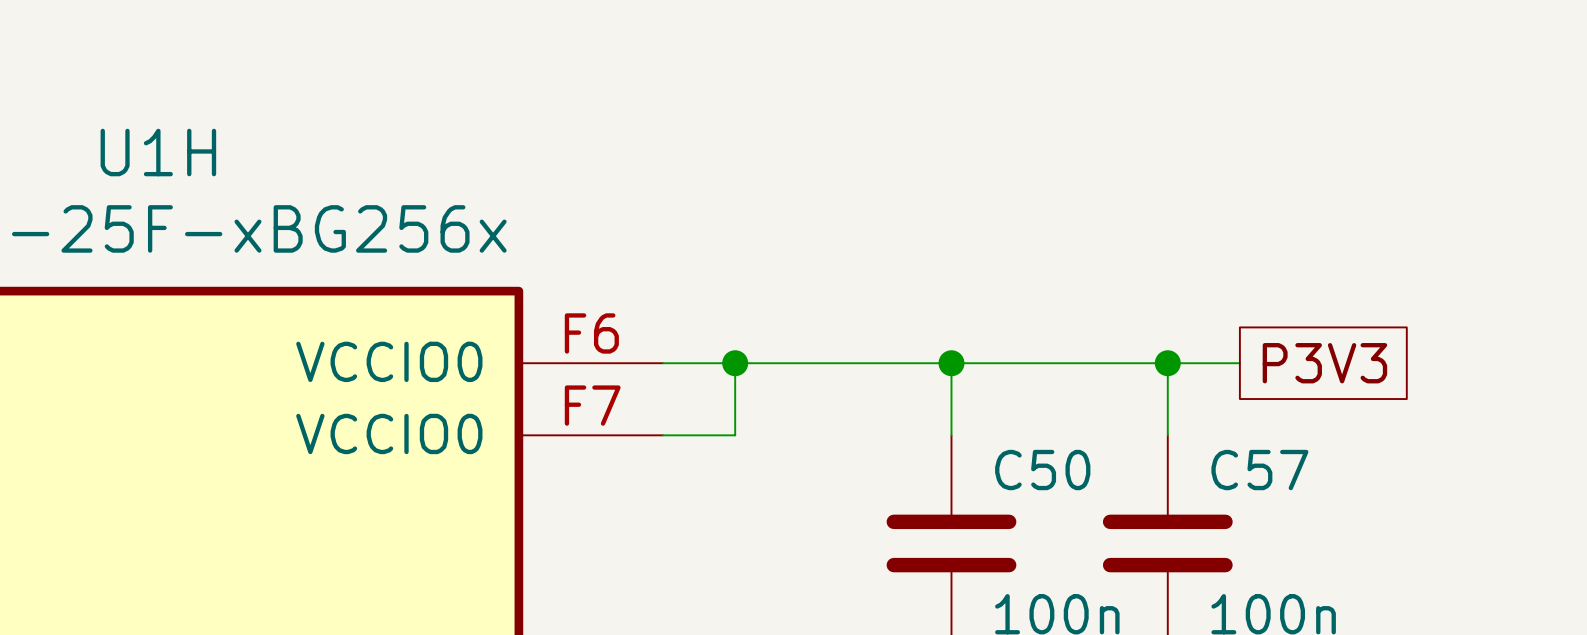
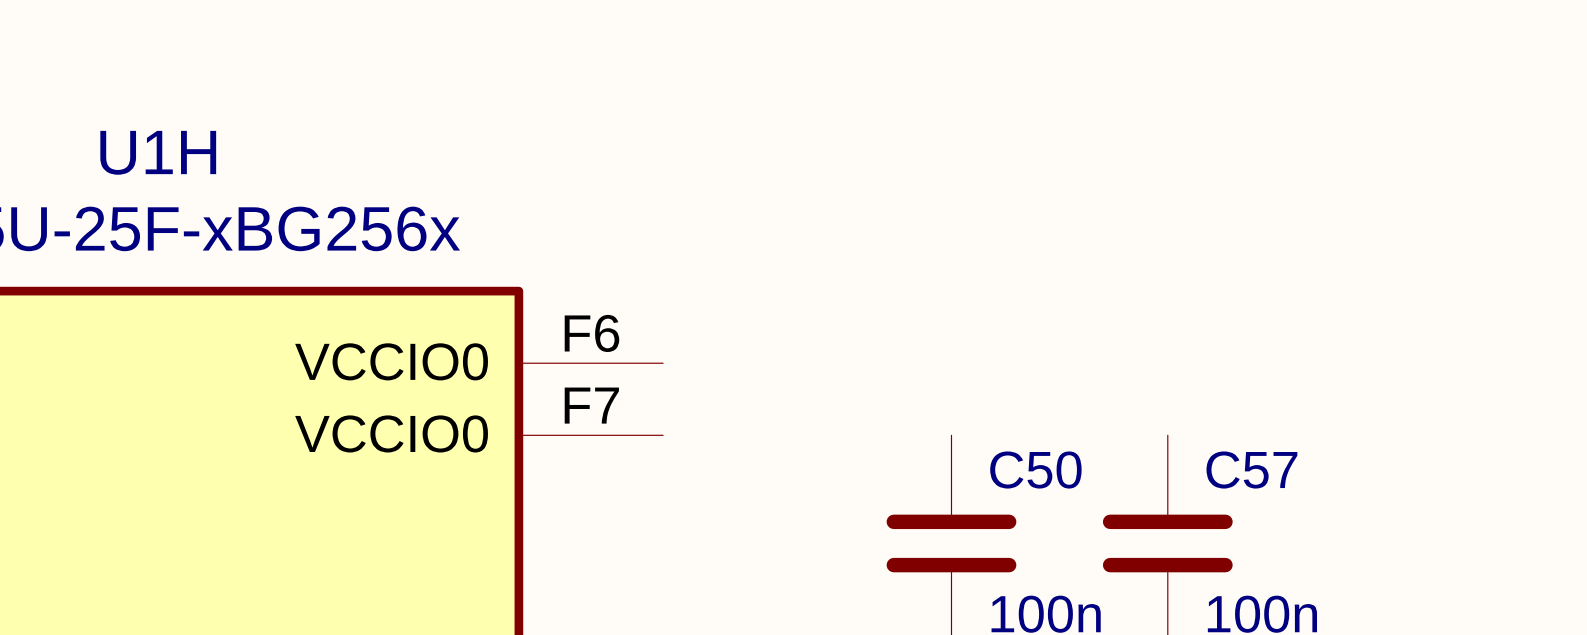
wire: (663, 363) (1239, 363) -> none
wire: (735, 363) (735, 435) (663, 435) -> none
junction: (735, 363) -> none
wire: (951, 363) (951, 435) -> none
junction: (951, 363) -> none
wire: (1167, 363) (1167, 435) -> none
junction: (1167, 363) -> none
global label: P3V3 (1324, 363) -> none

